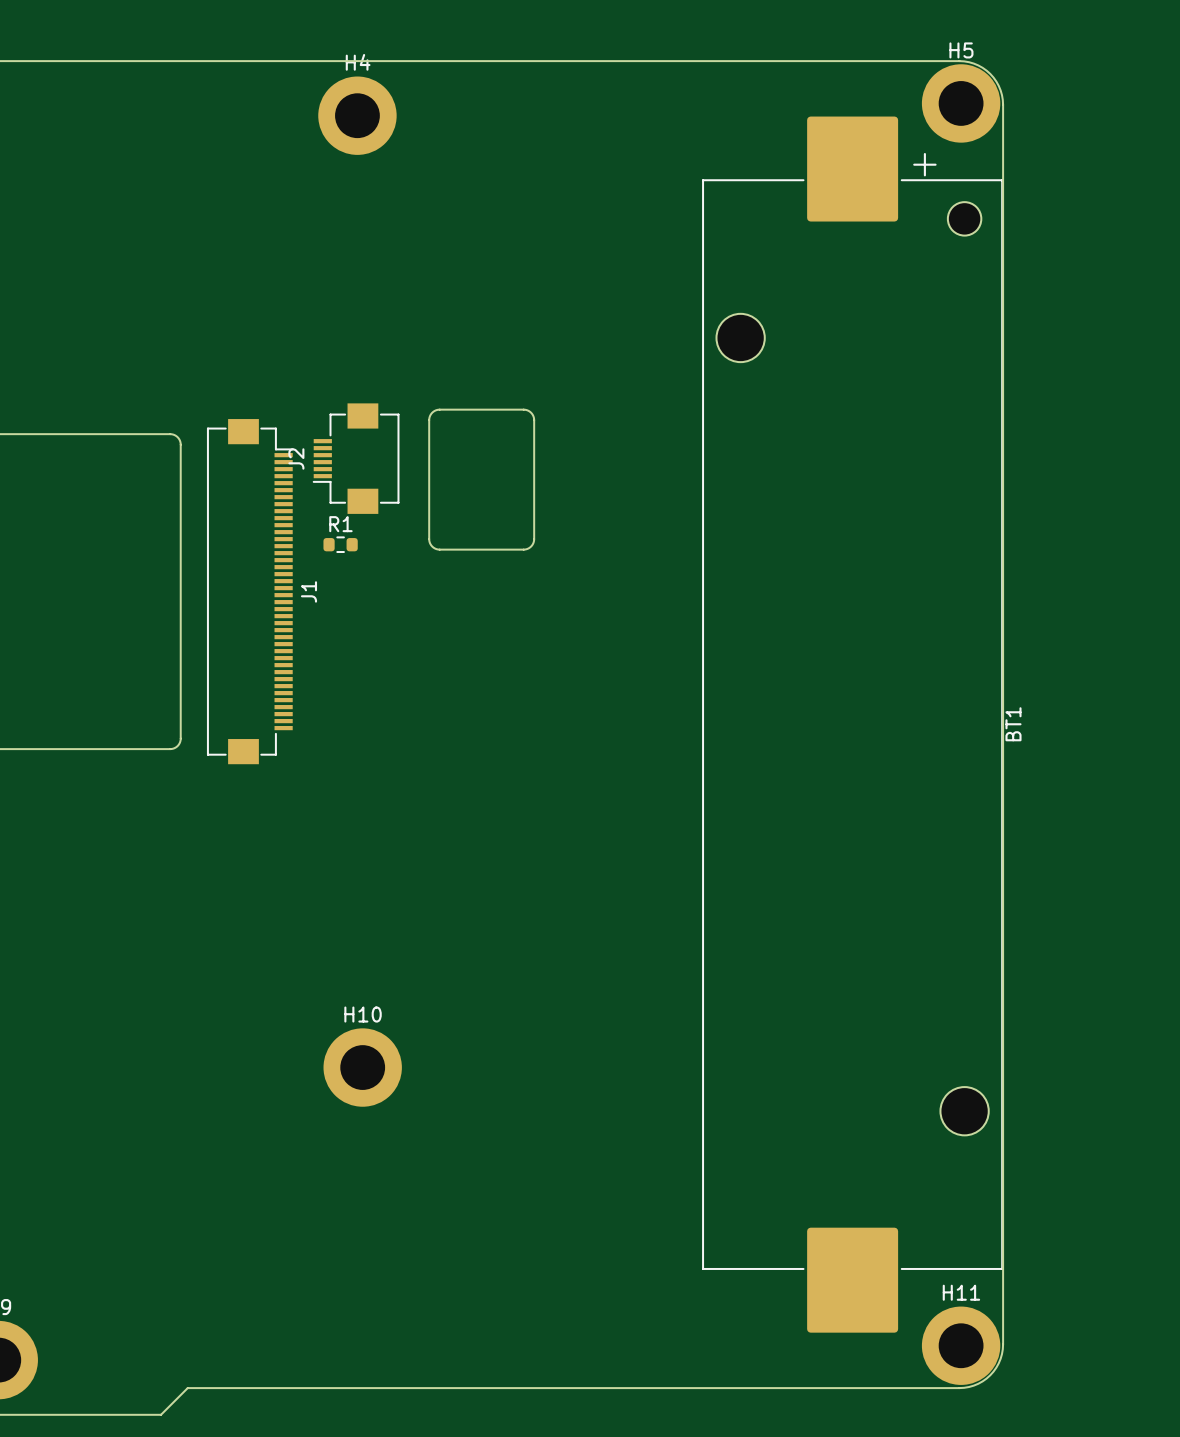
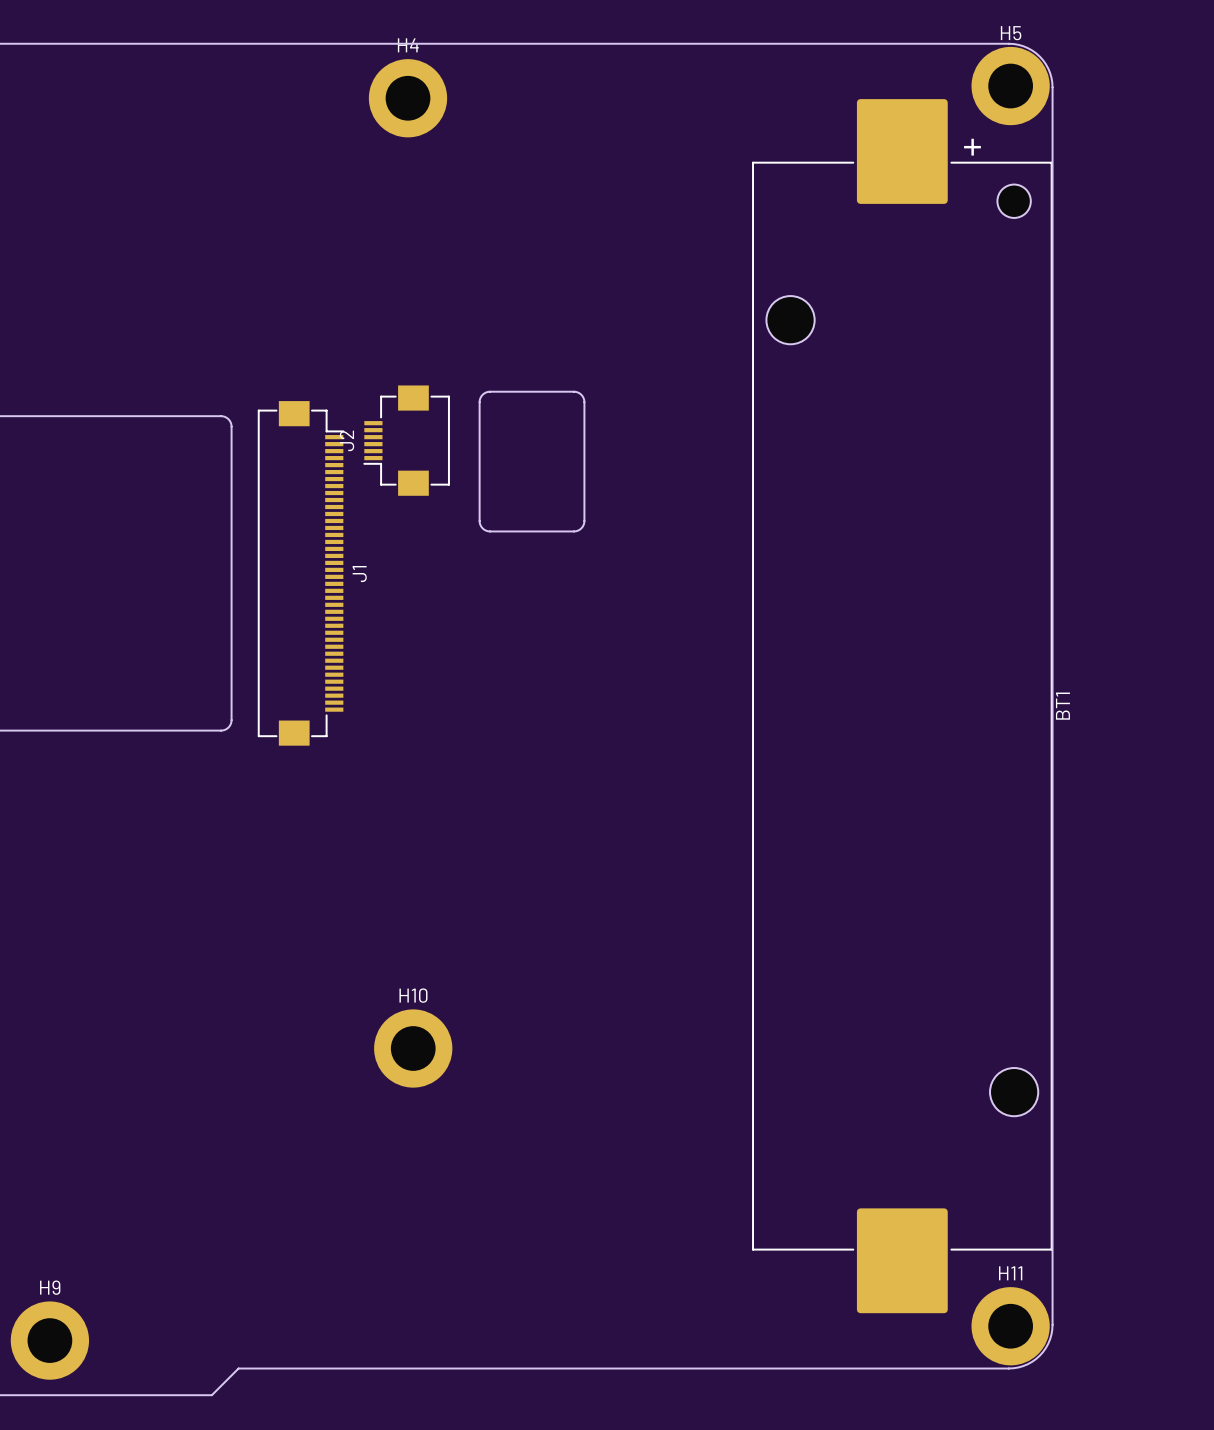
R1: (340, 544) -> none

